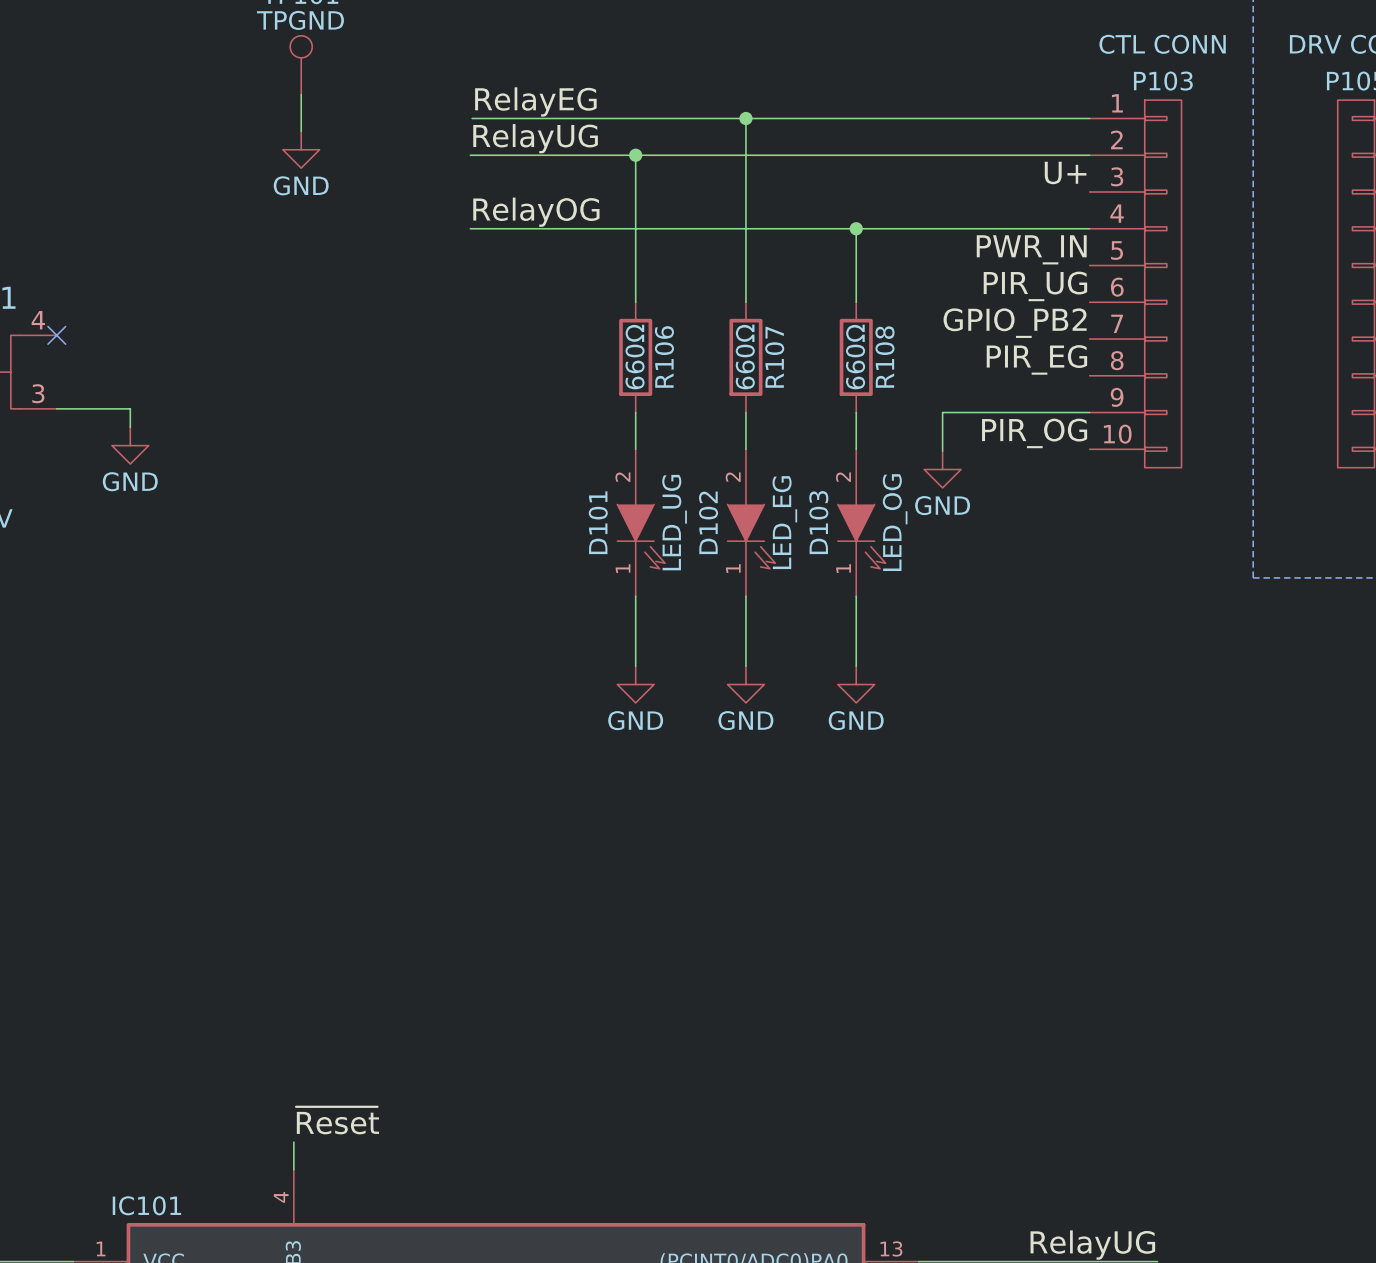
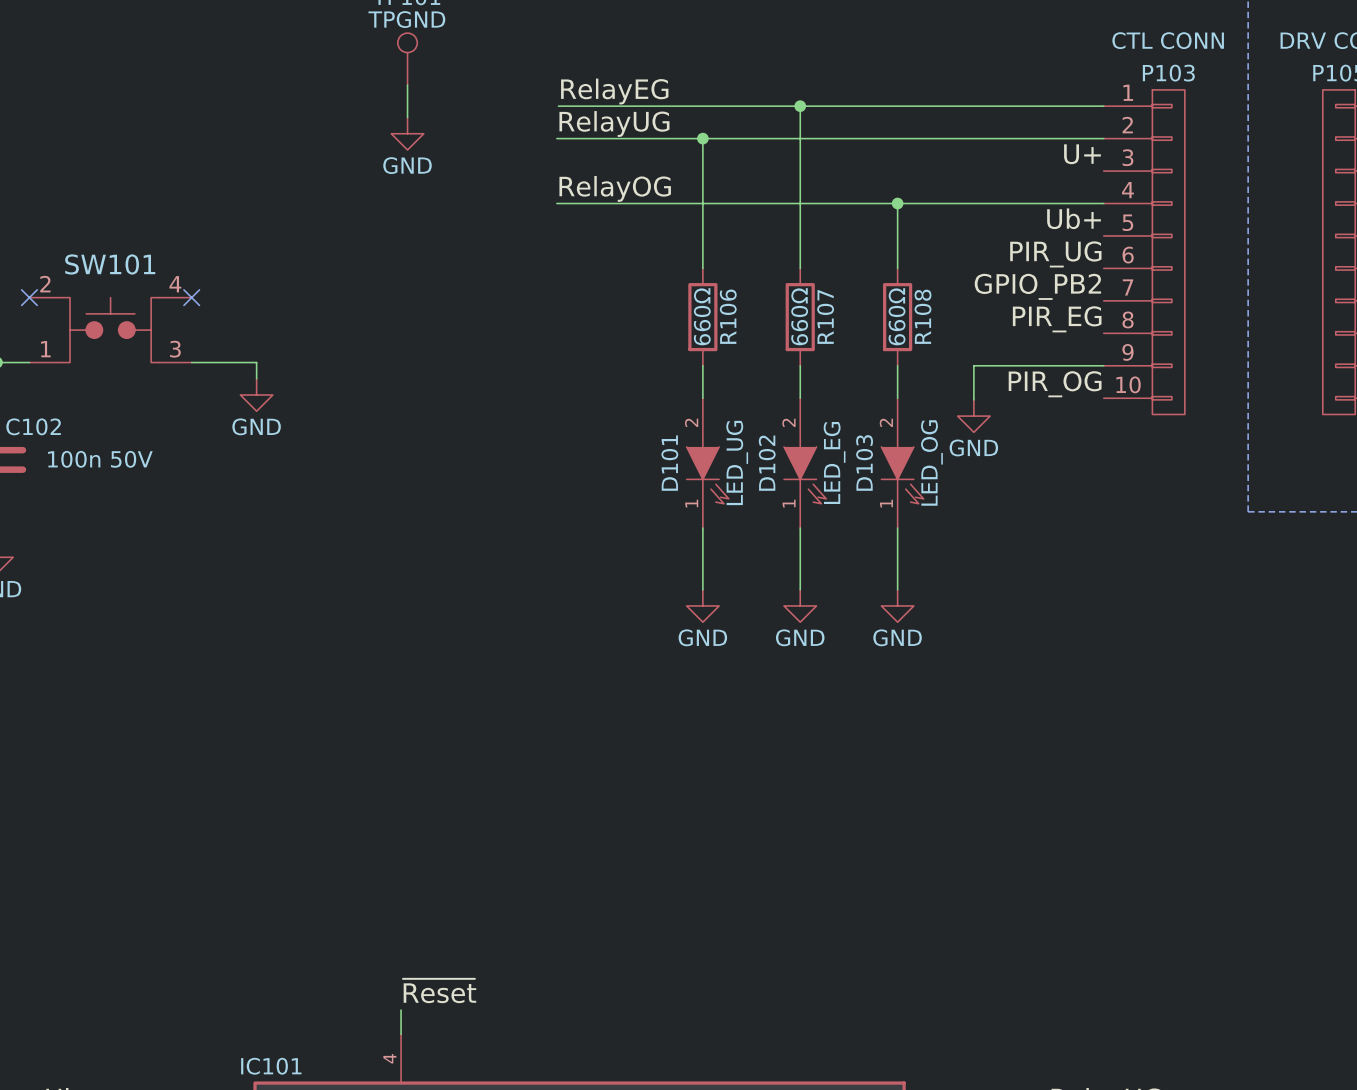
label: PWR_IN (1031, 249) -> Ub+ (1074, 218)

